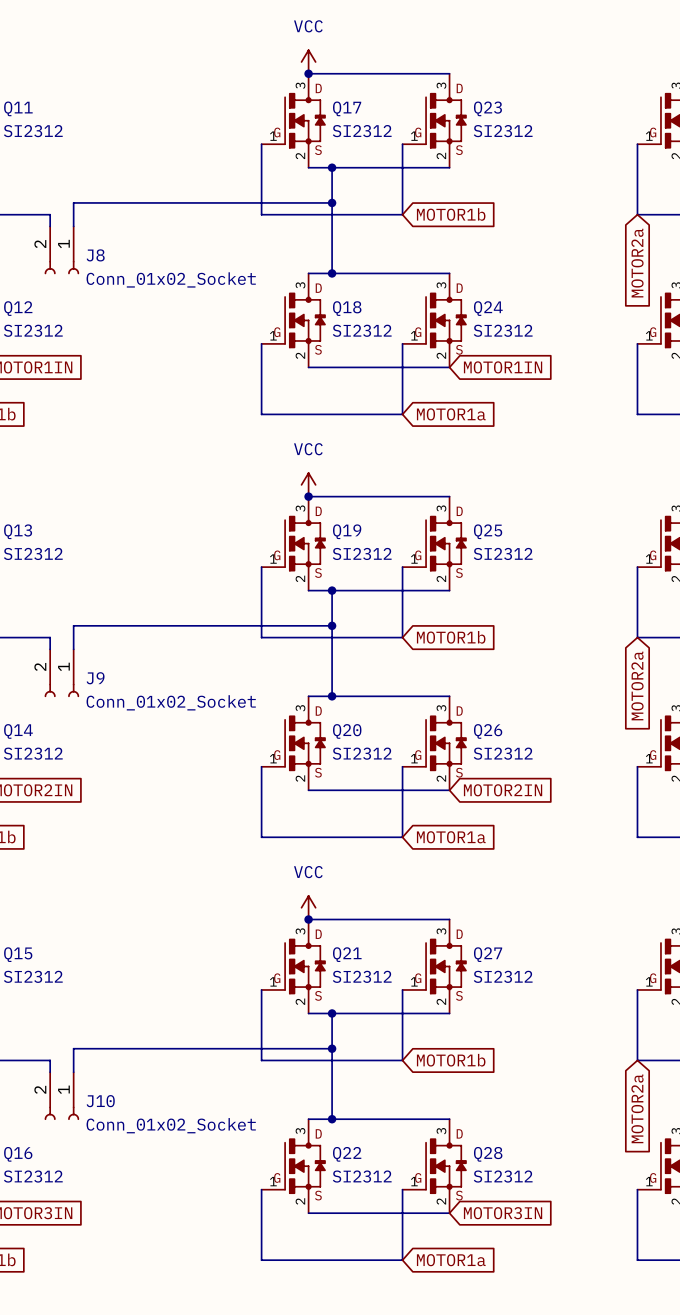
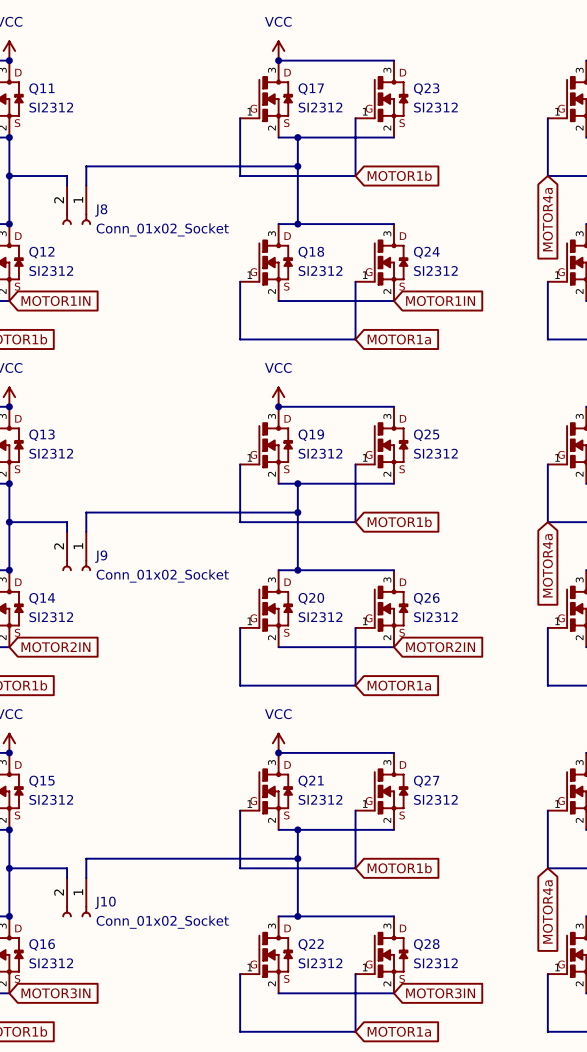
global label: MOTOR2a (637, 263) -> MOTOR4a (547, 219)
global label: MOTOR2a (637, 685) -> MOTOR4a (547, 565)
global label: MOTOR2a (637, 1108) -> MOTOR4a (547, 912)

